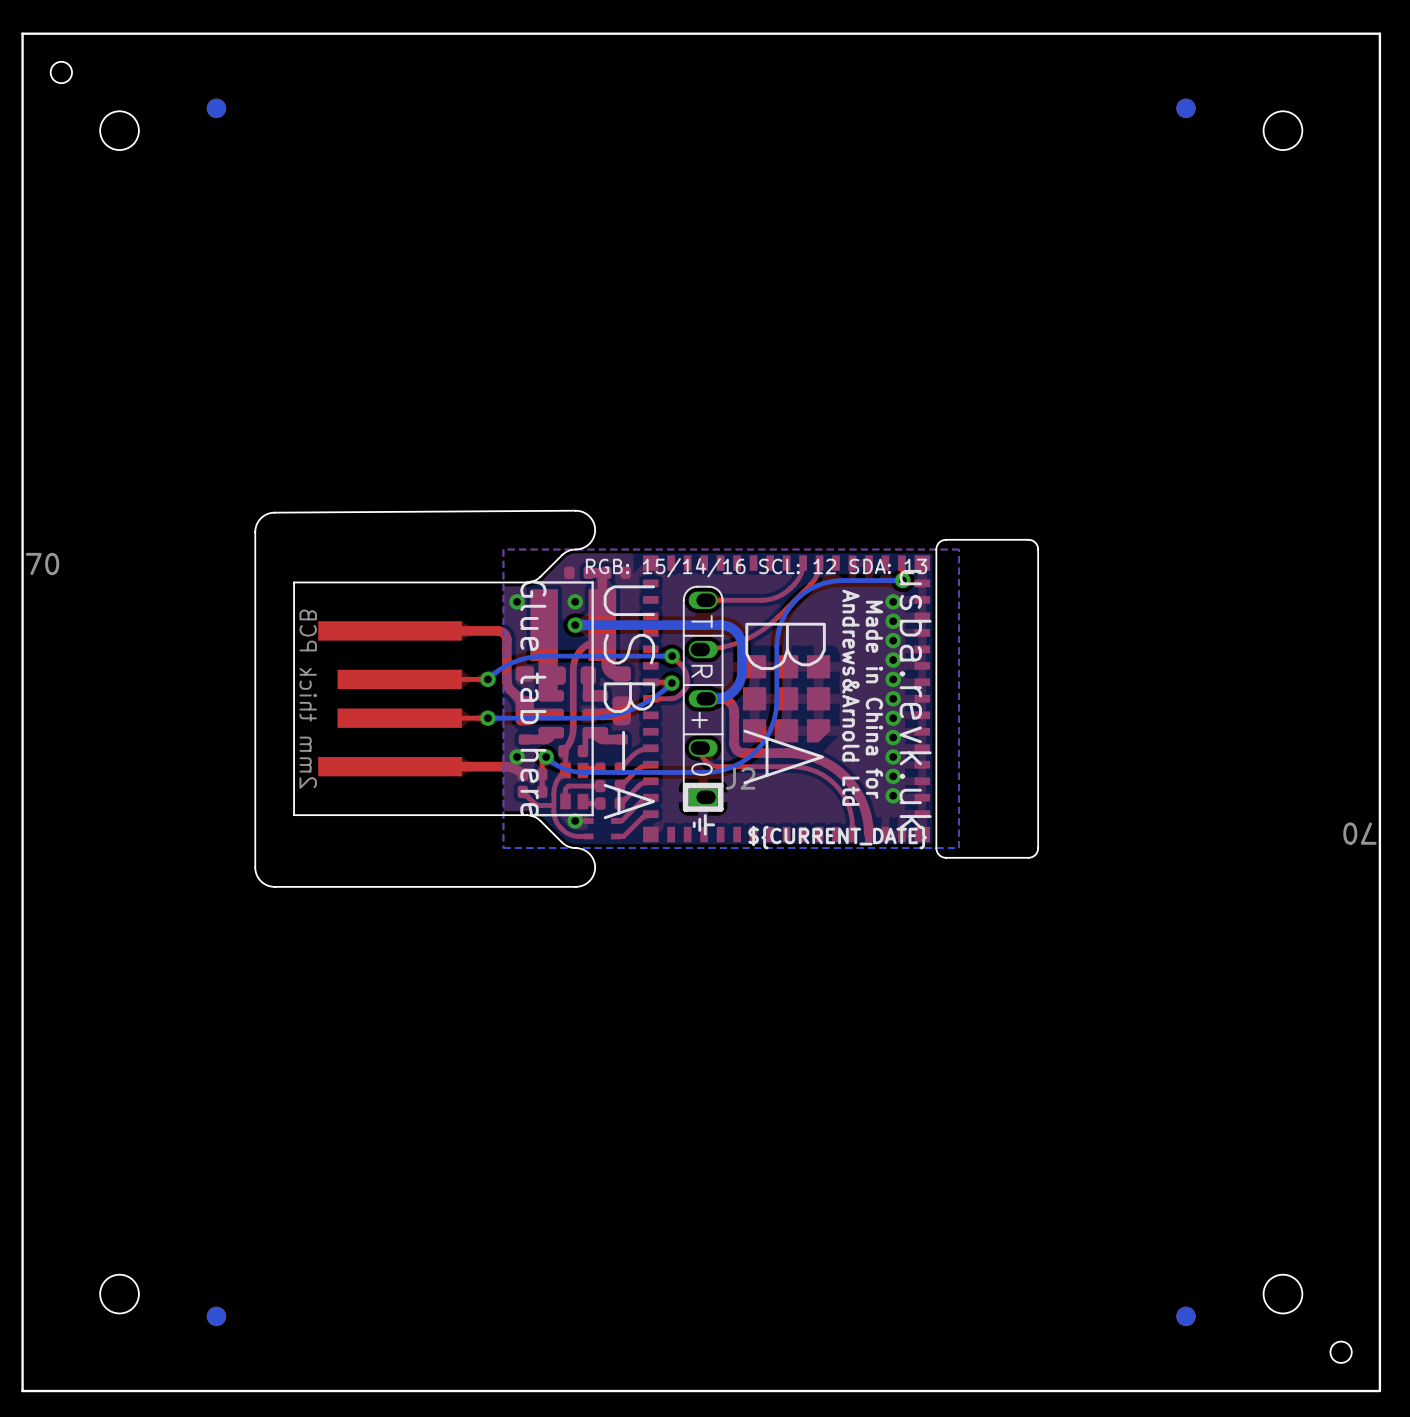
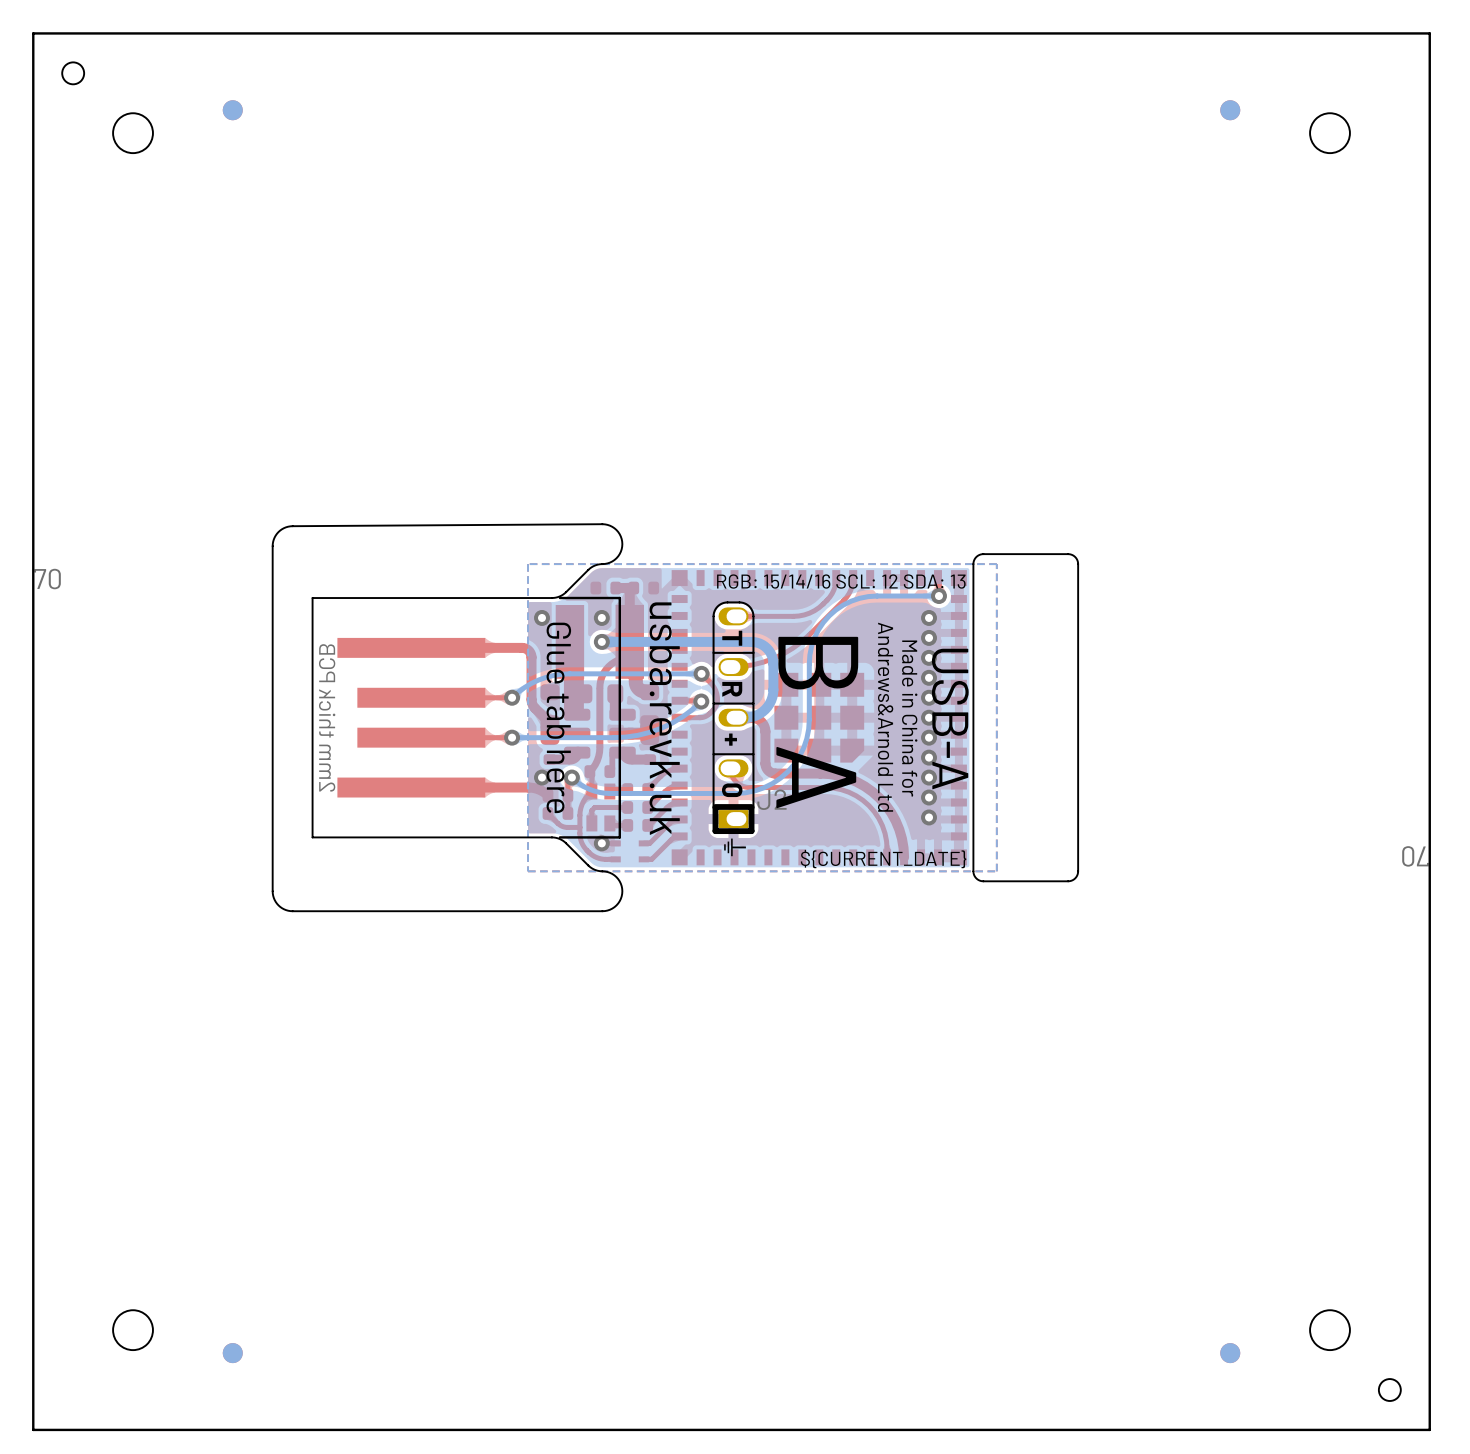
text: usba.revk.uk (915, 699) -> USB-A (950, 719)
text: USB-A (629, 702) -> usba.revk.uk (664, 718)

